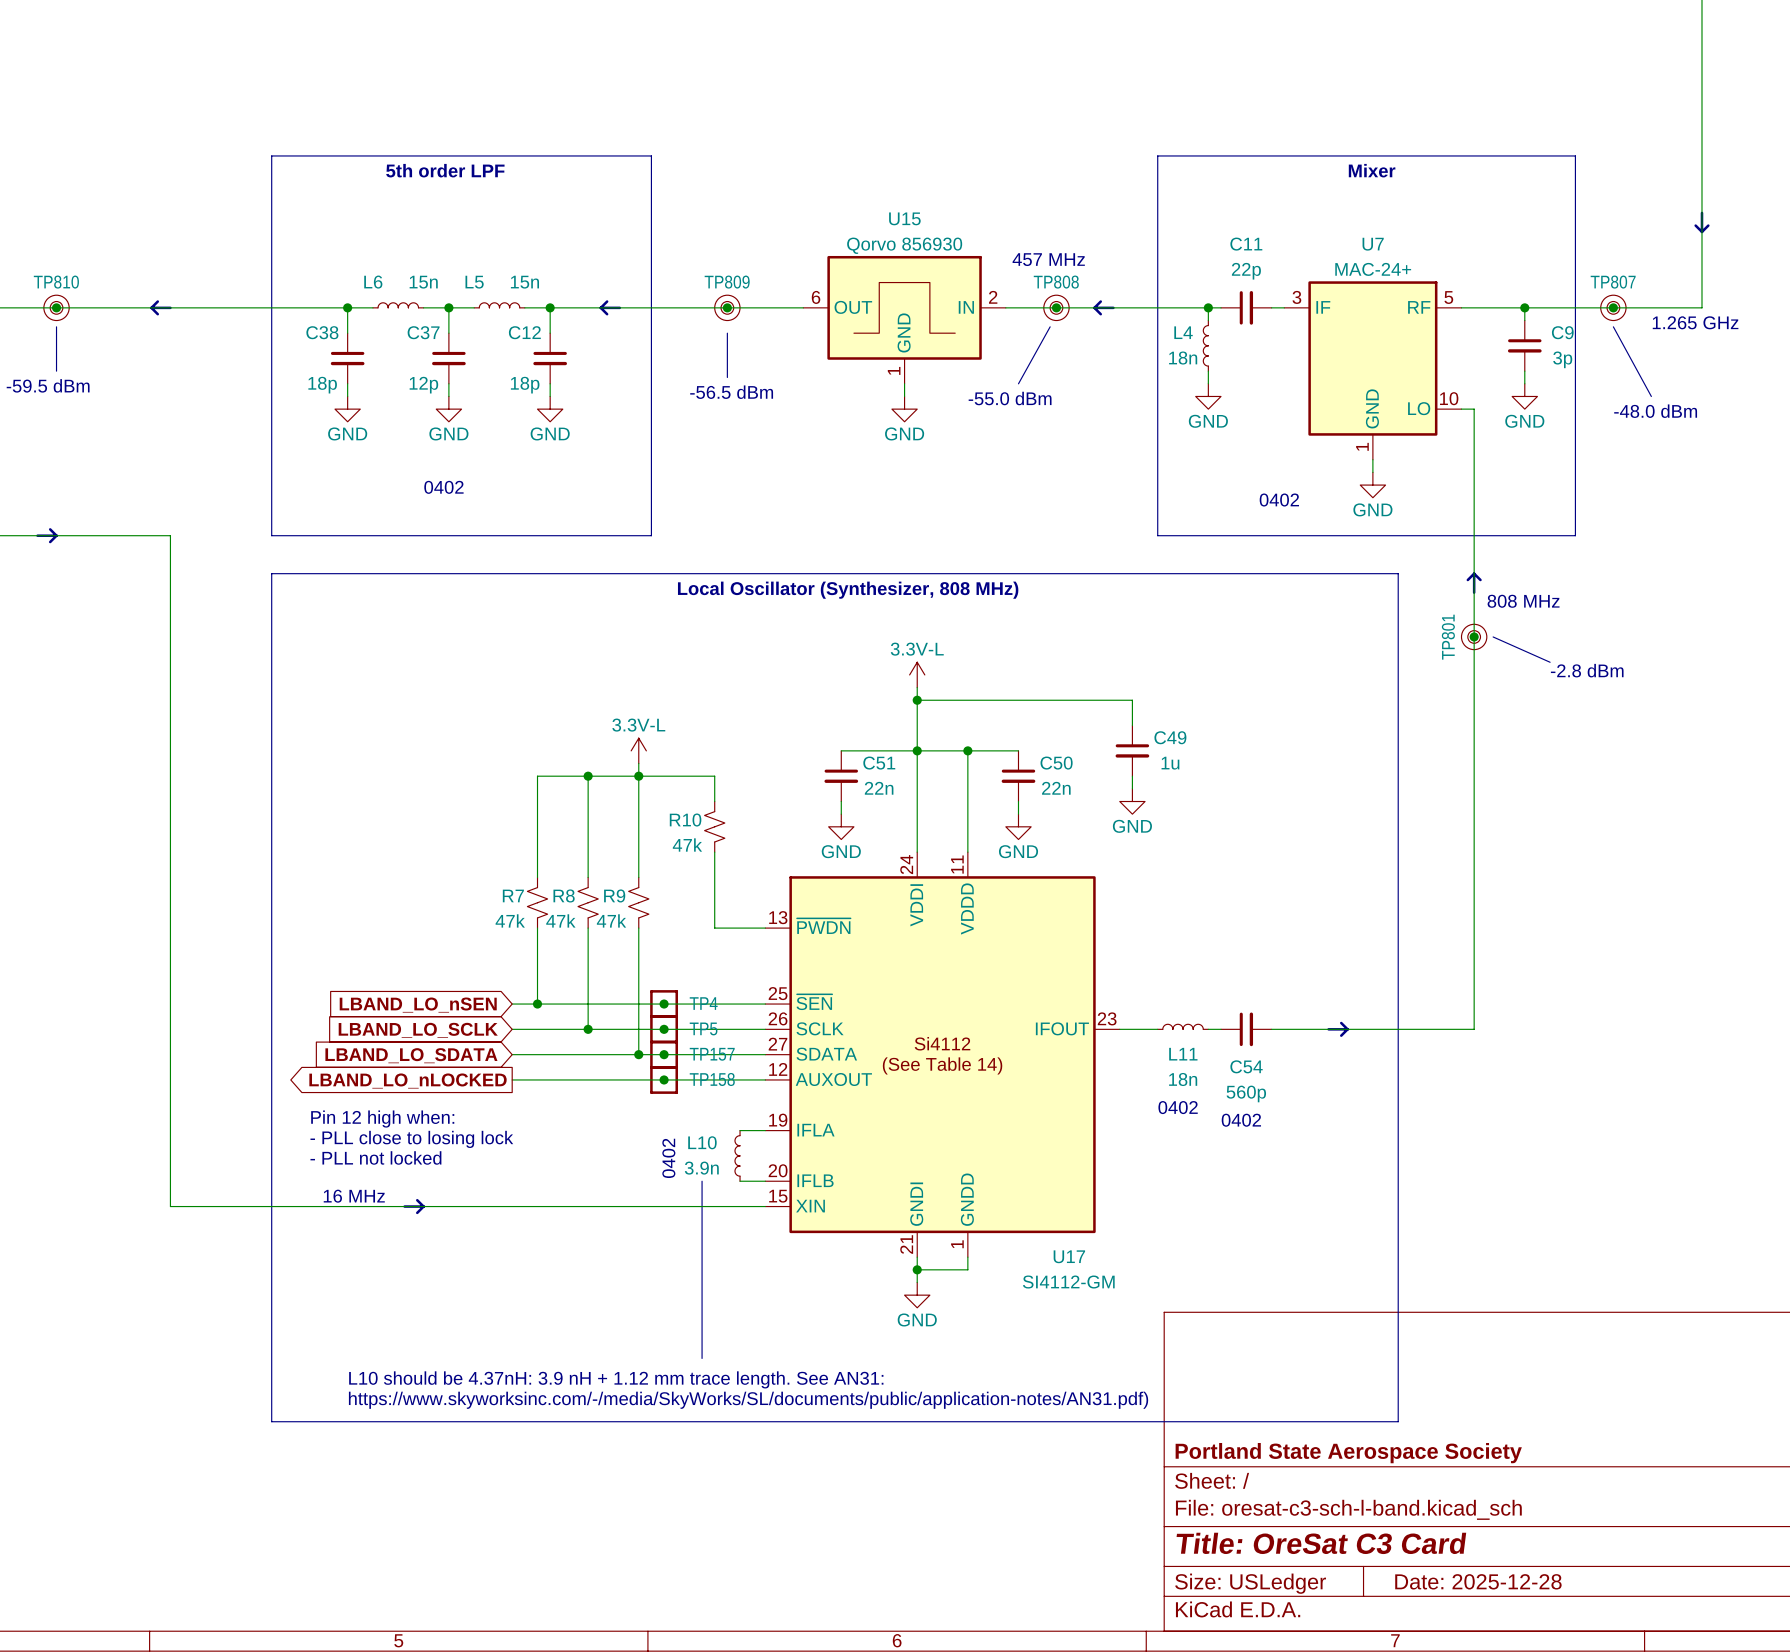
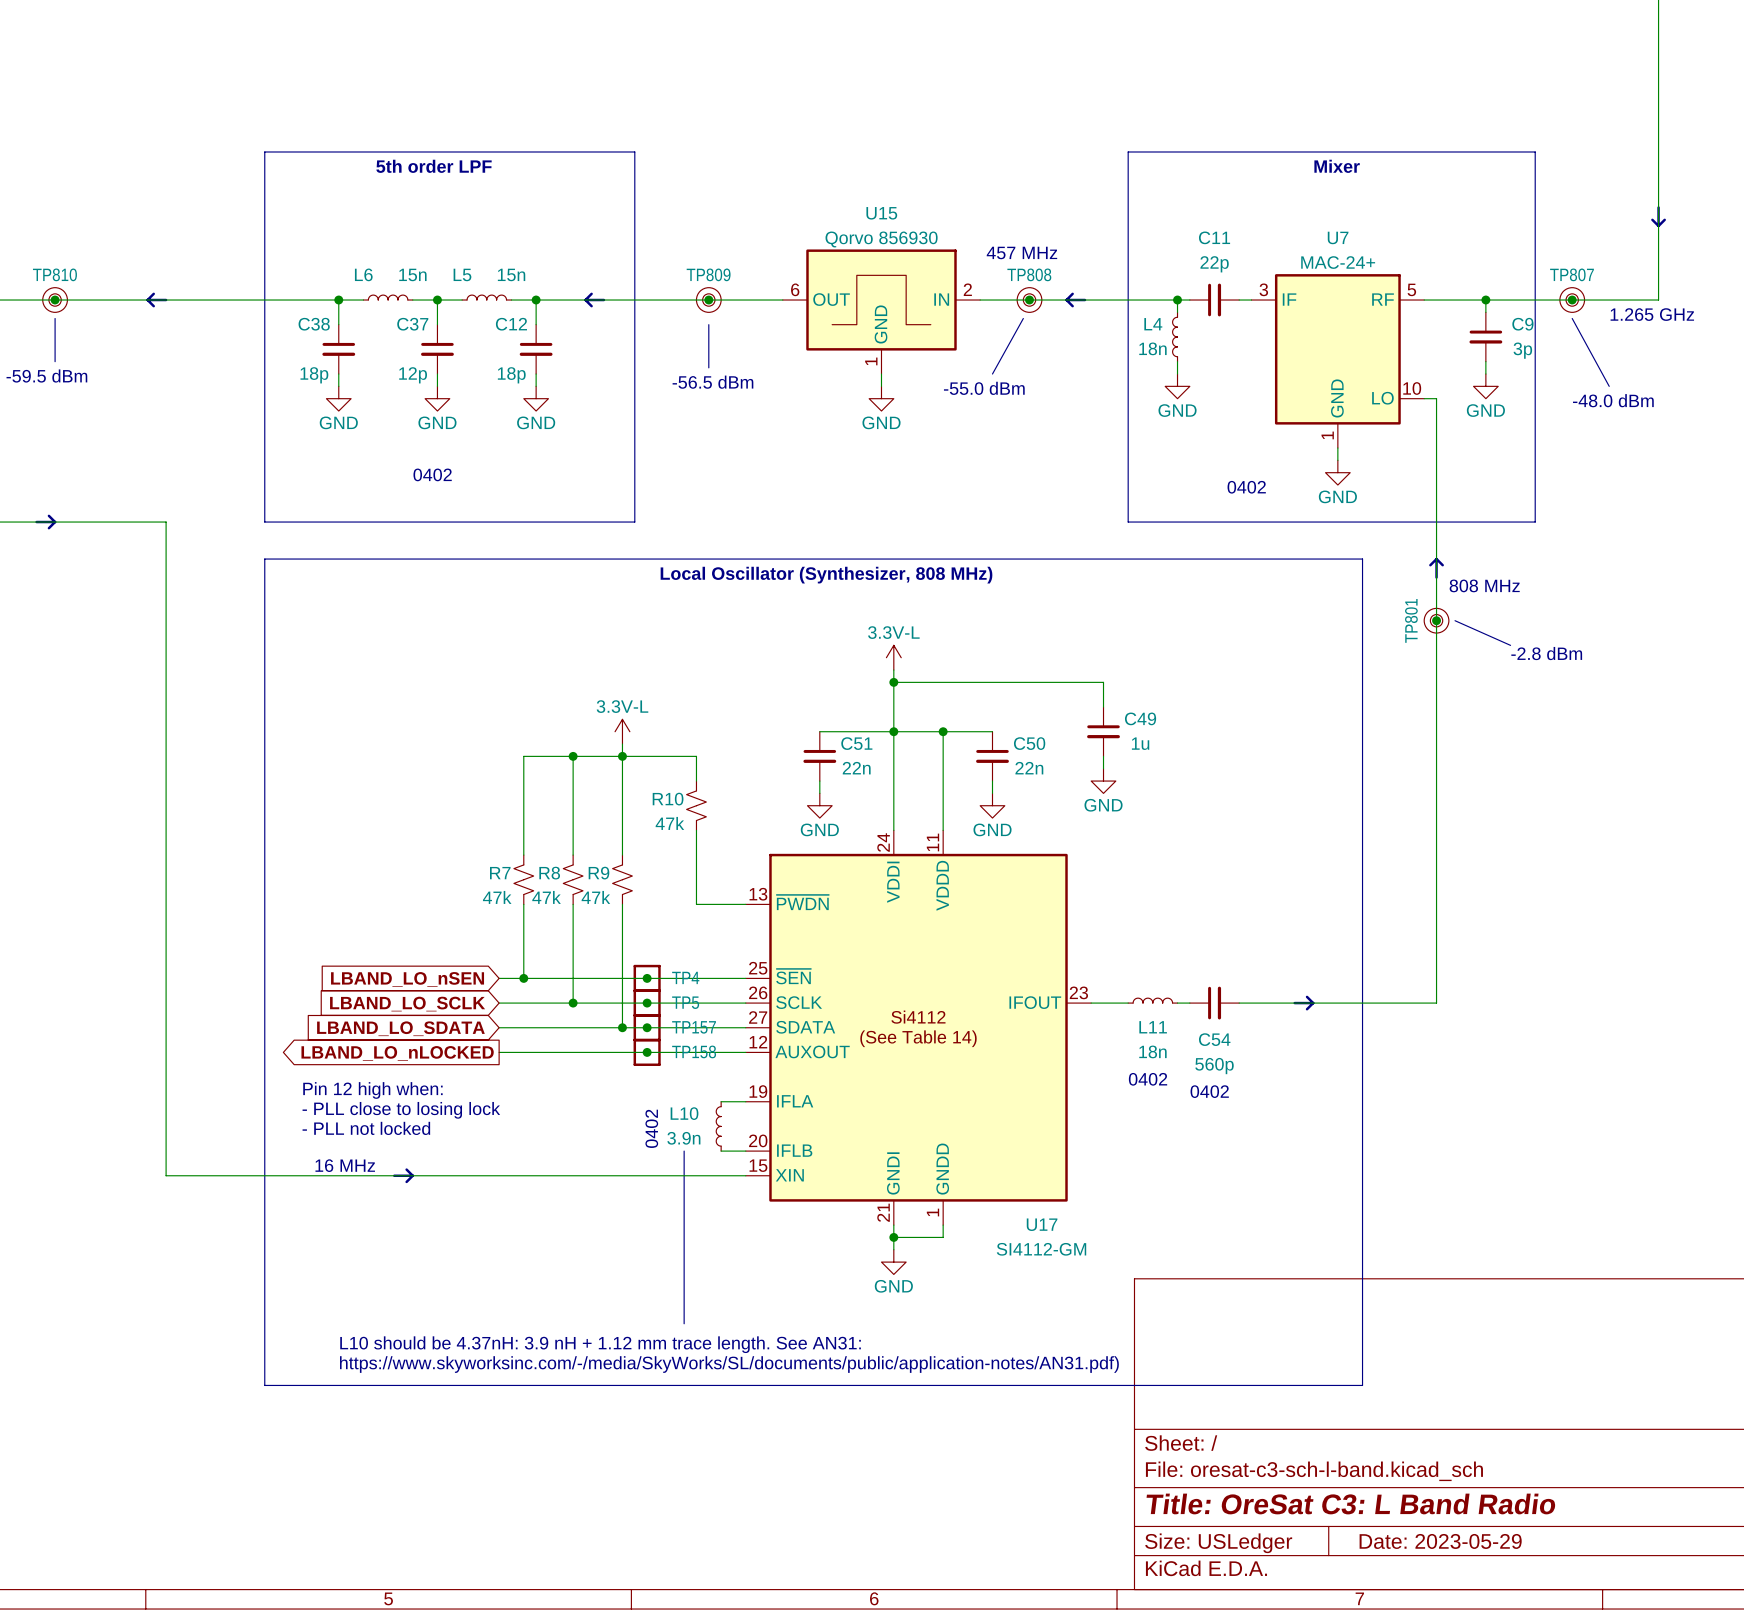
title block: Portland State Aerospace Society (1348, 1453) -> none
title block: Title: OreSat C3 Card (1321, 1543) -> Title: OreSat C3: L Band Radio (1351, 1504)
title block: Date: 2025-12-28 (1478, 1581) -> Date: 2023-05-29 (1440, 1541)

